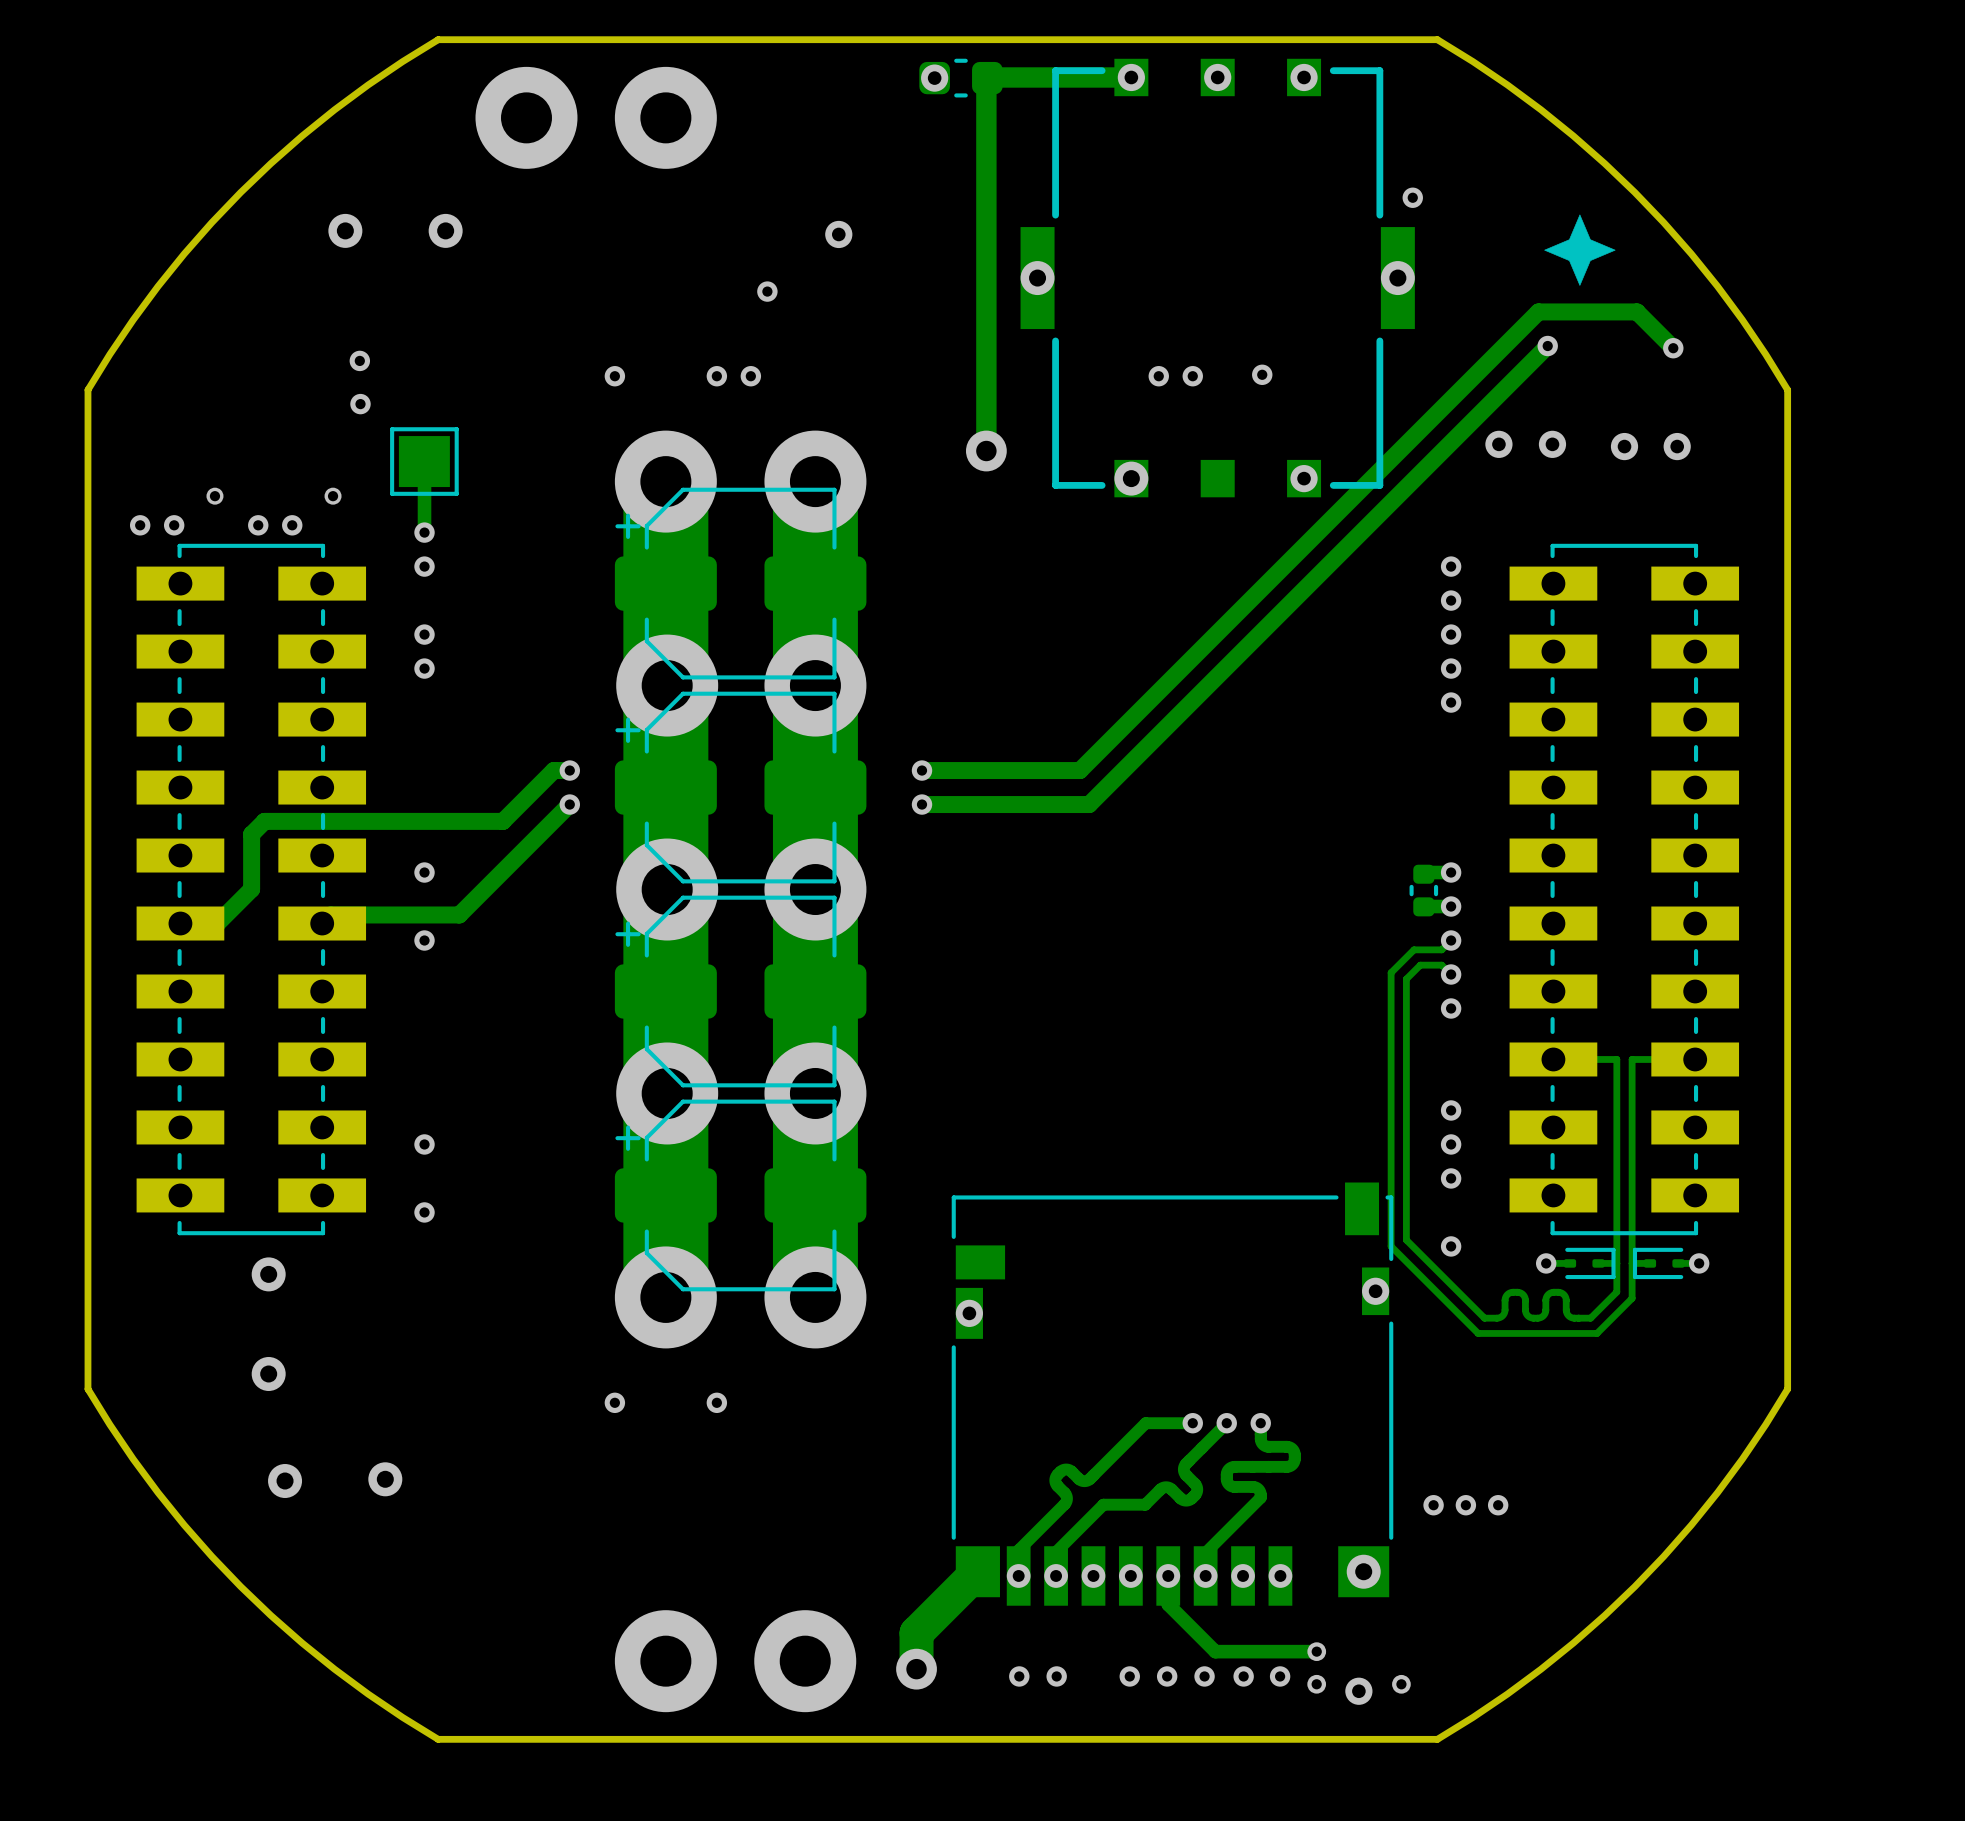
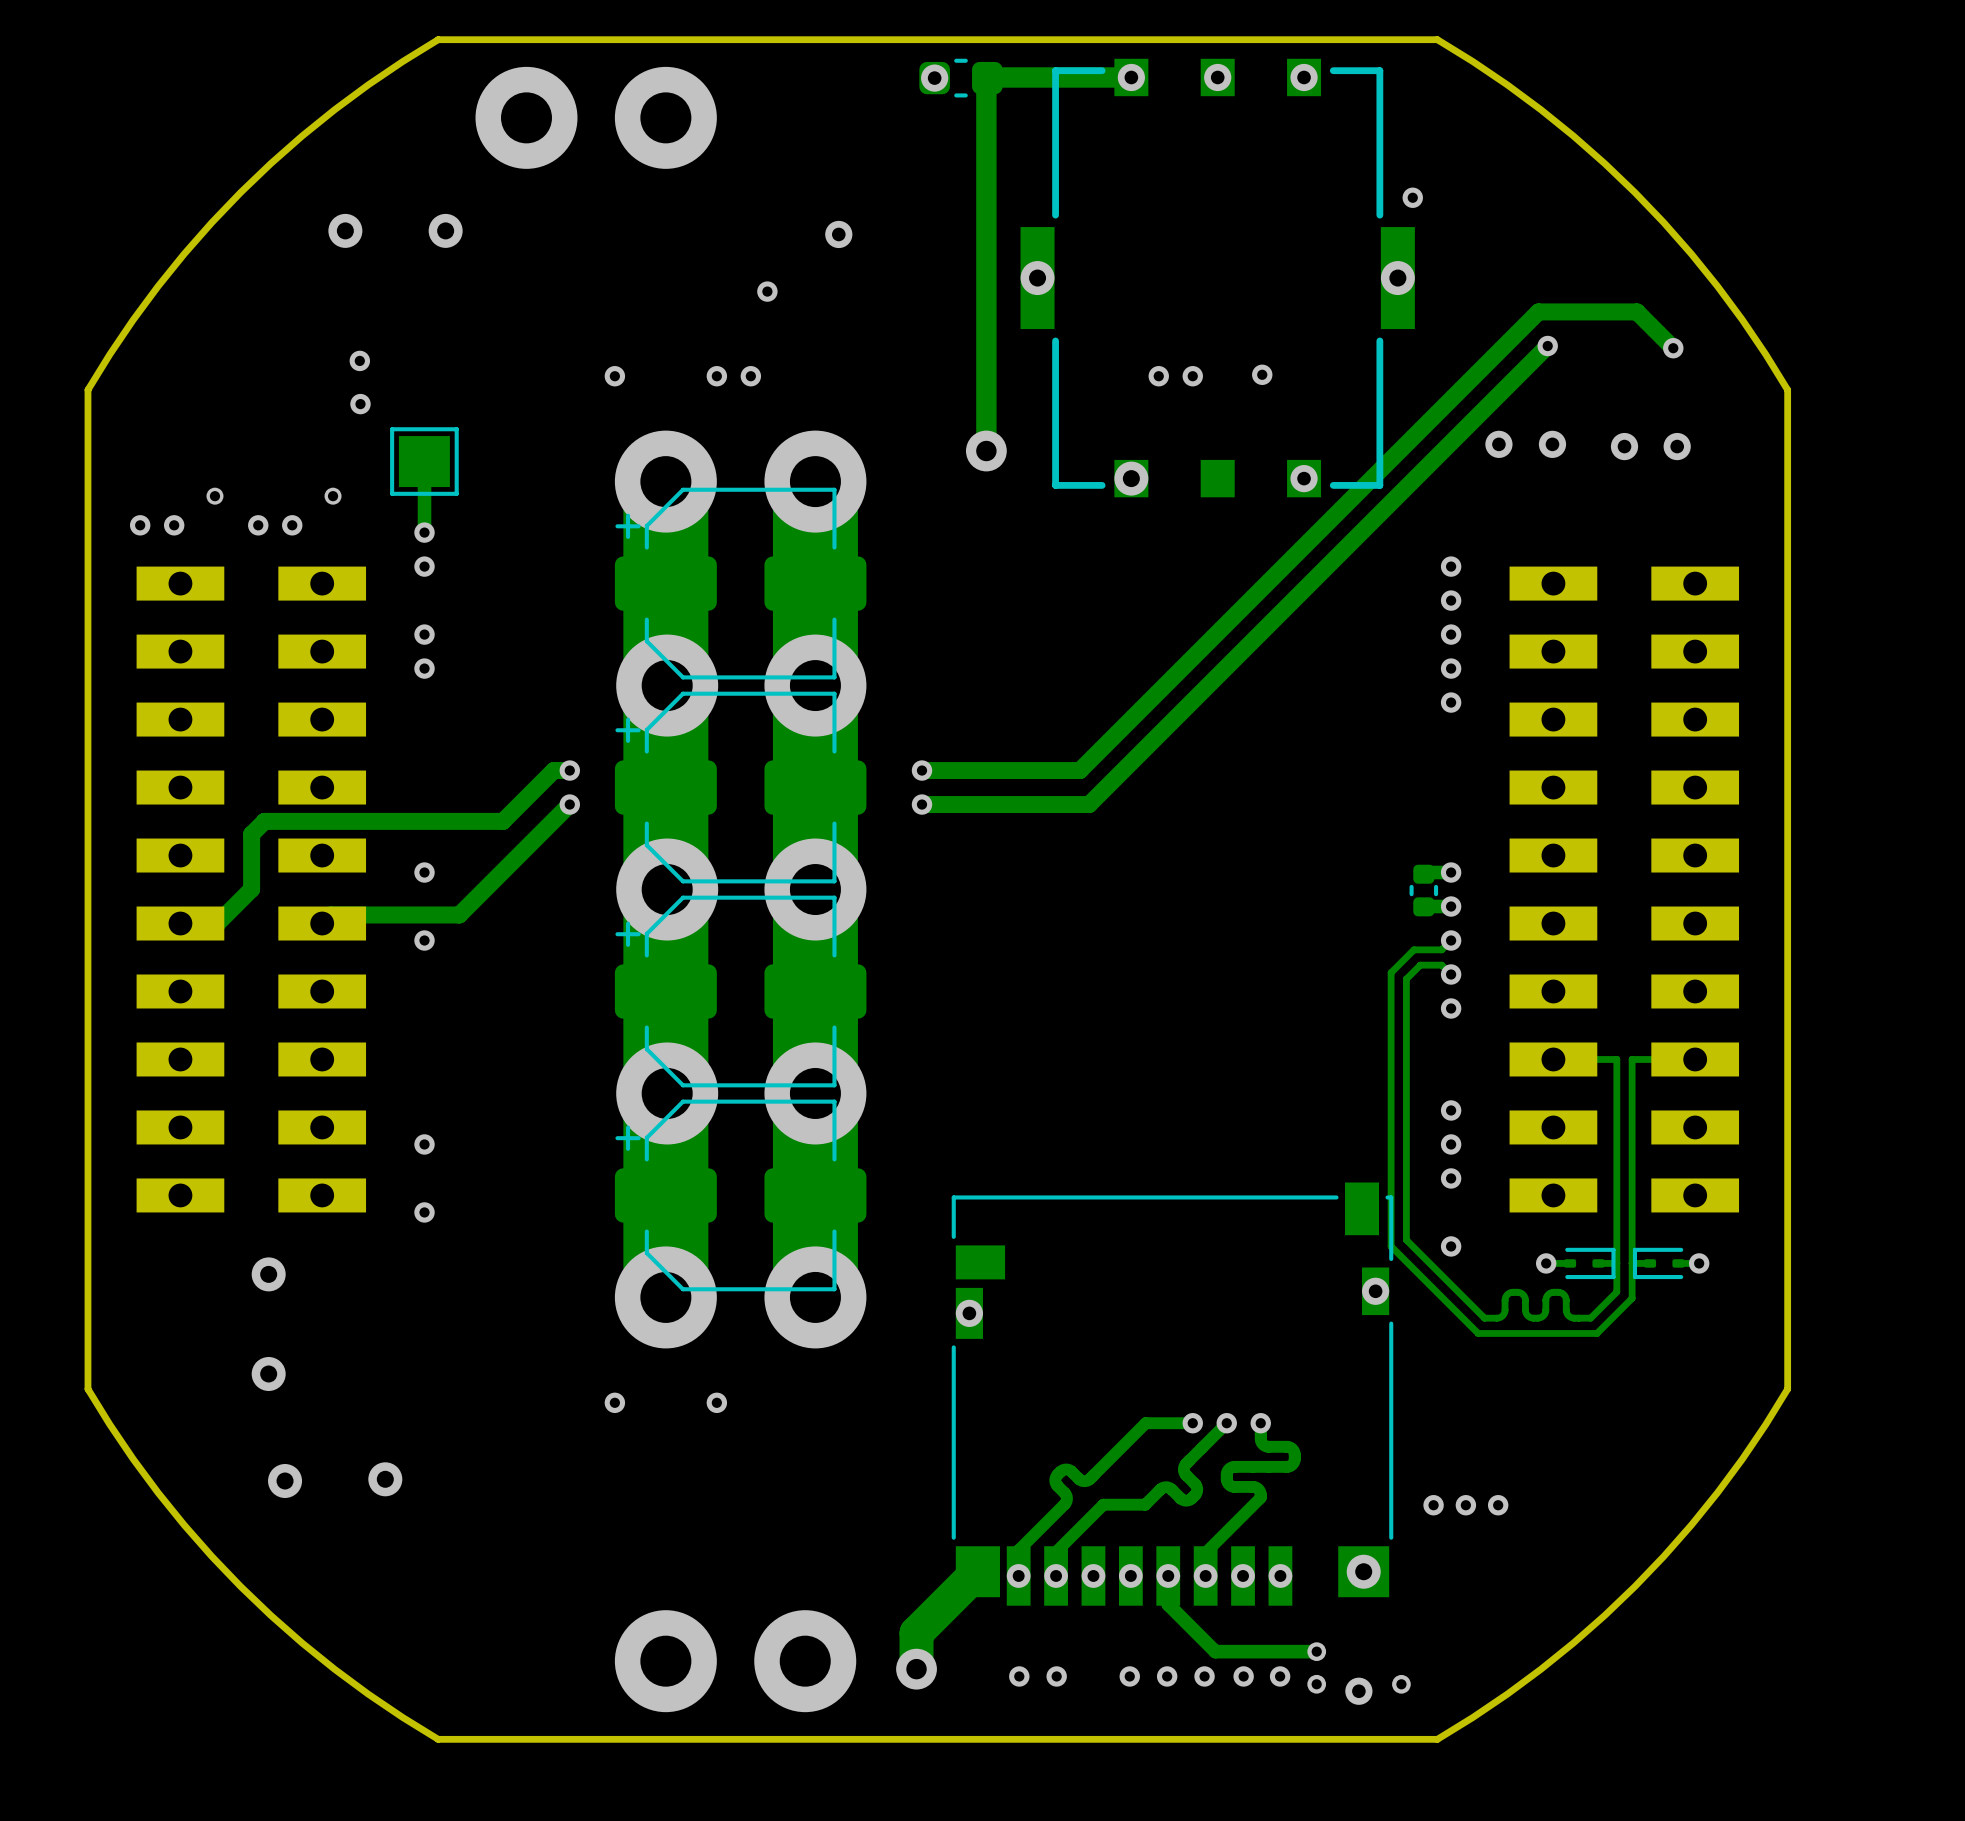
drawing: [1544, 214, 1616, 286] -> none
part footprint: [136, 543, 367, 1236] -> [136, 566, 367, 1213]
part footprint: [1509, 543, 1740, 1236] -> [1509, 566, 1740, 1213]

